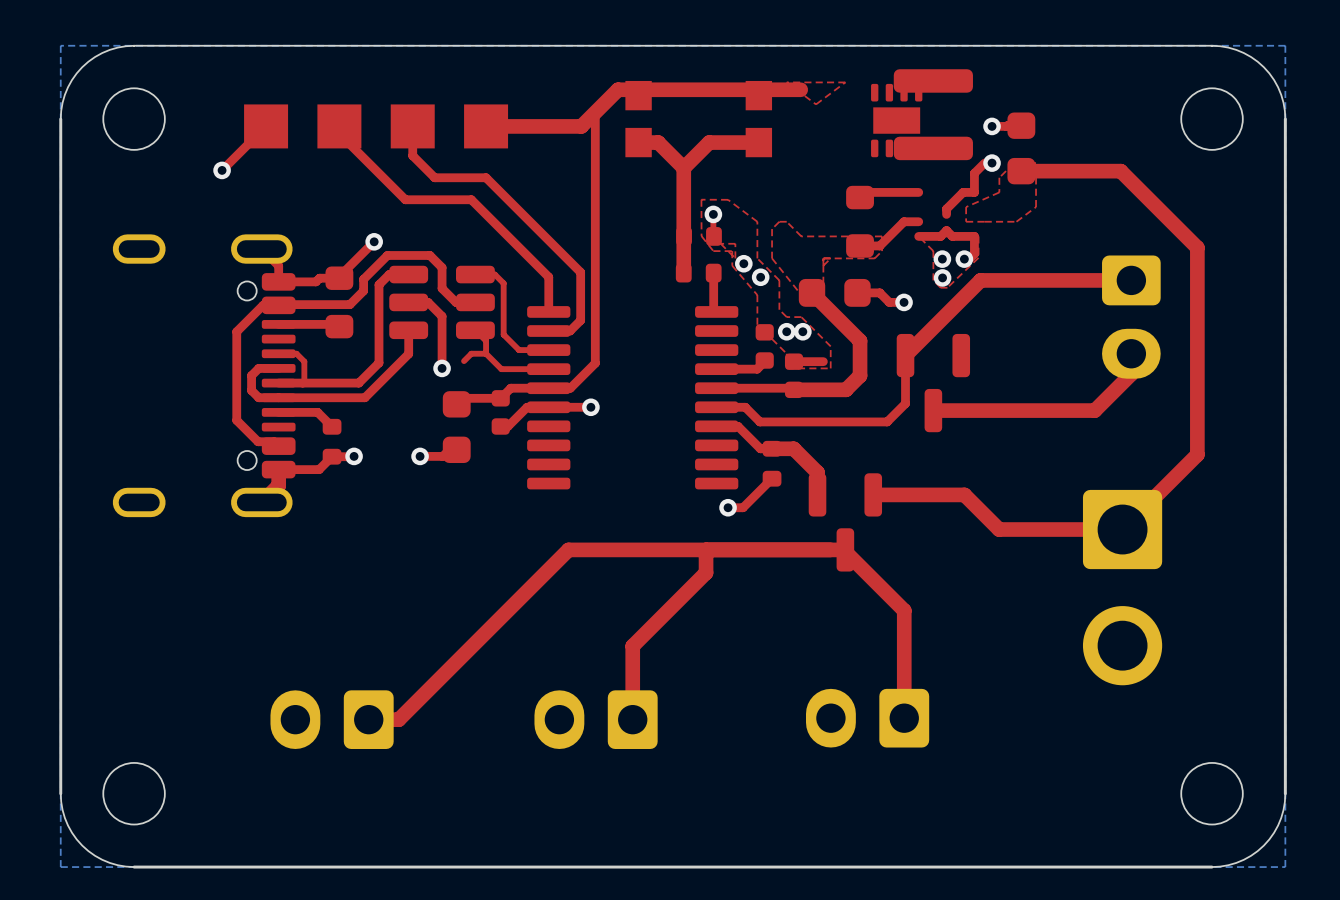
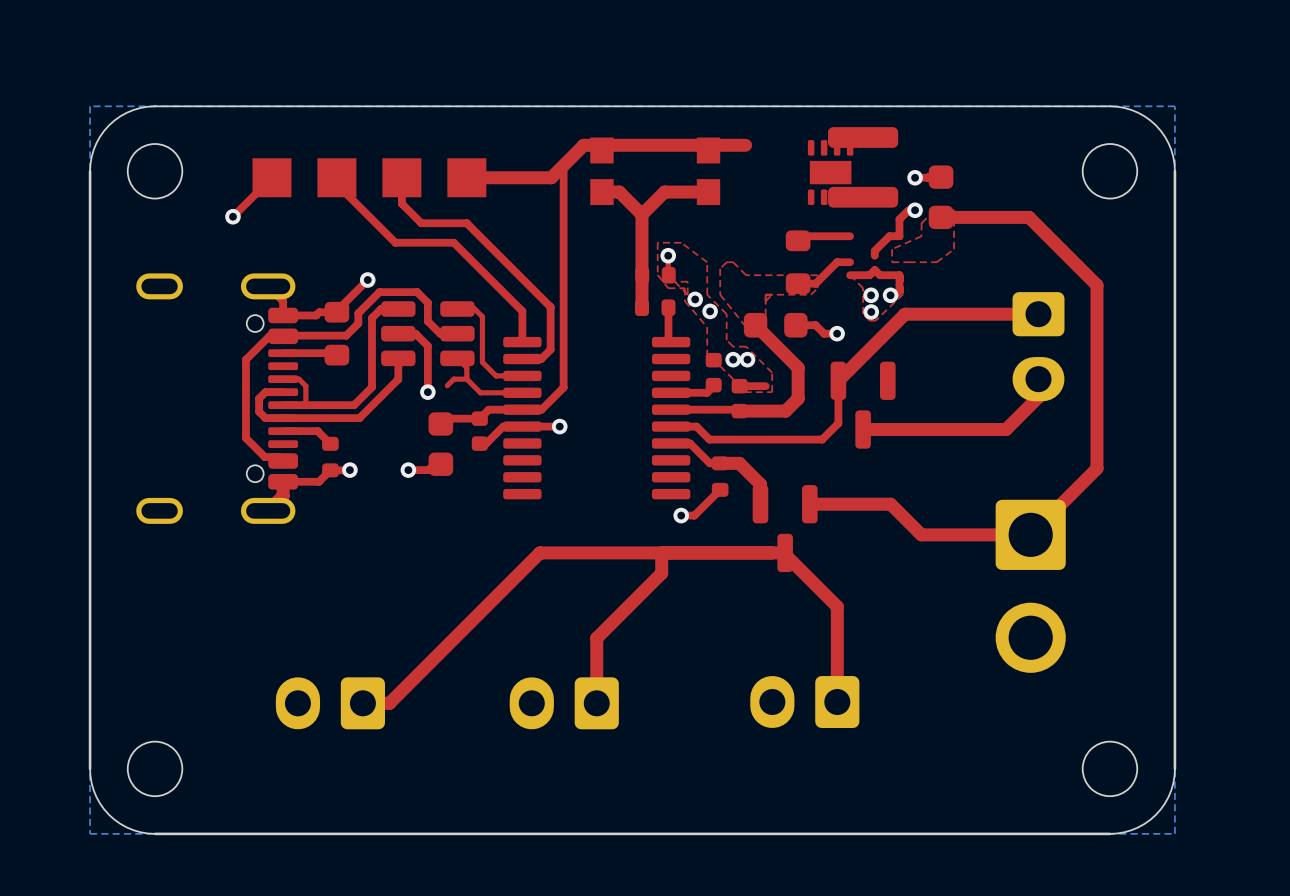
top zone outline: (845, 82) (786, 82) (816, 104) (845, 82) -> none

